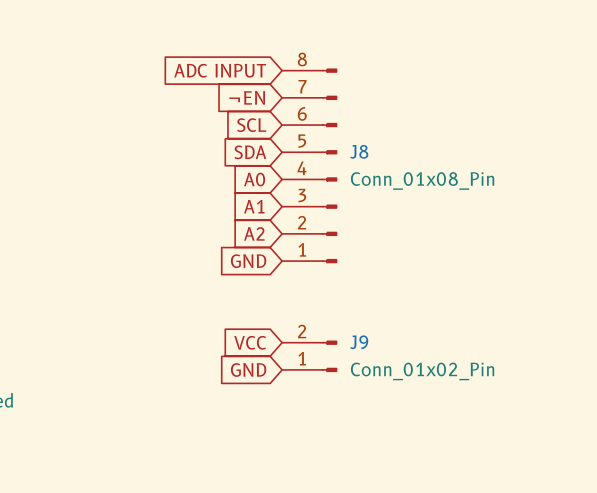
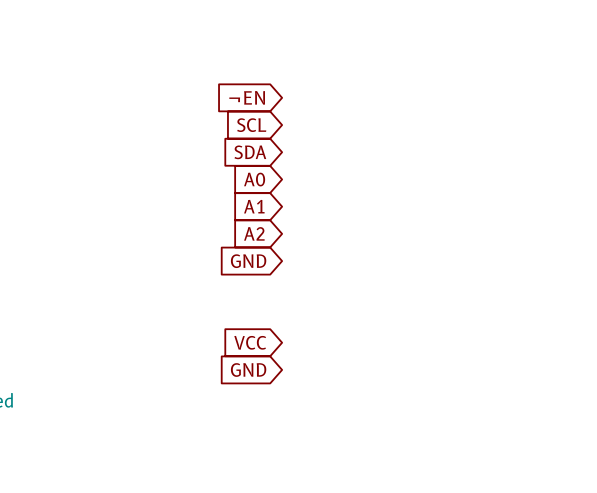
global label: ADC INPUT (220, 70) -> none
J8: Conn_01x08_Pin (309, 165) -> none
J9: Conn_01x02_Pin (309, 356) -> none

